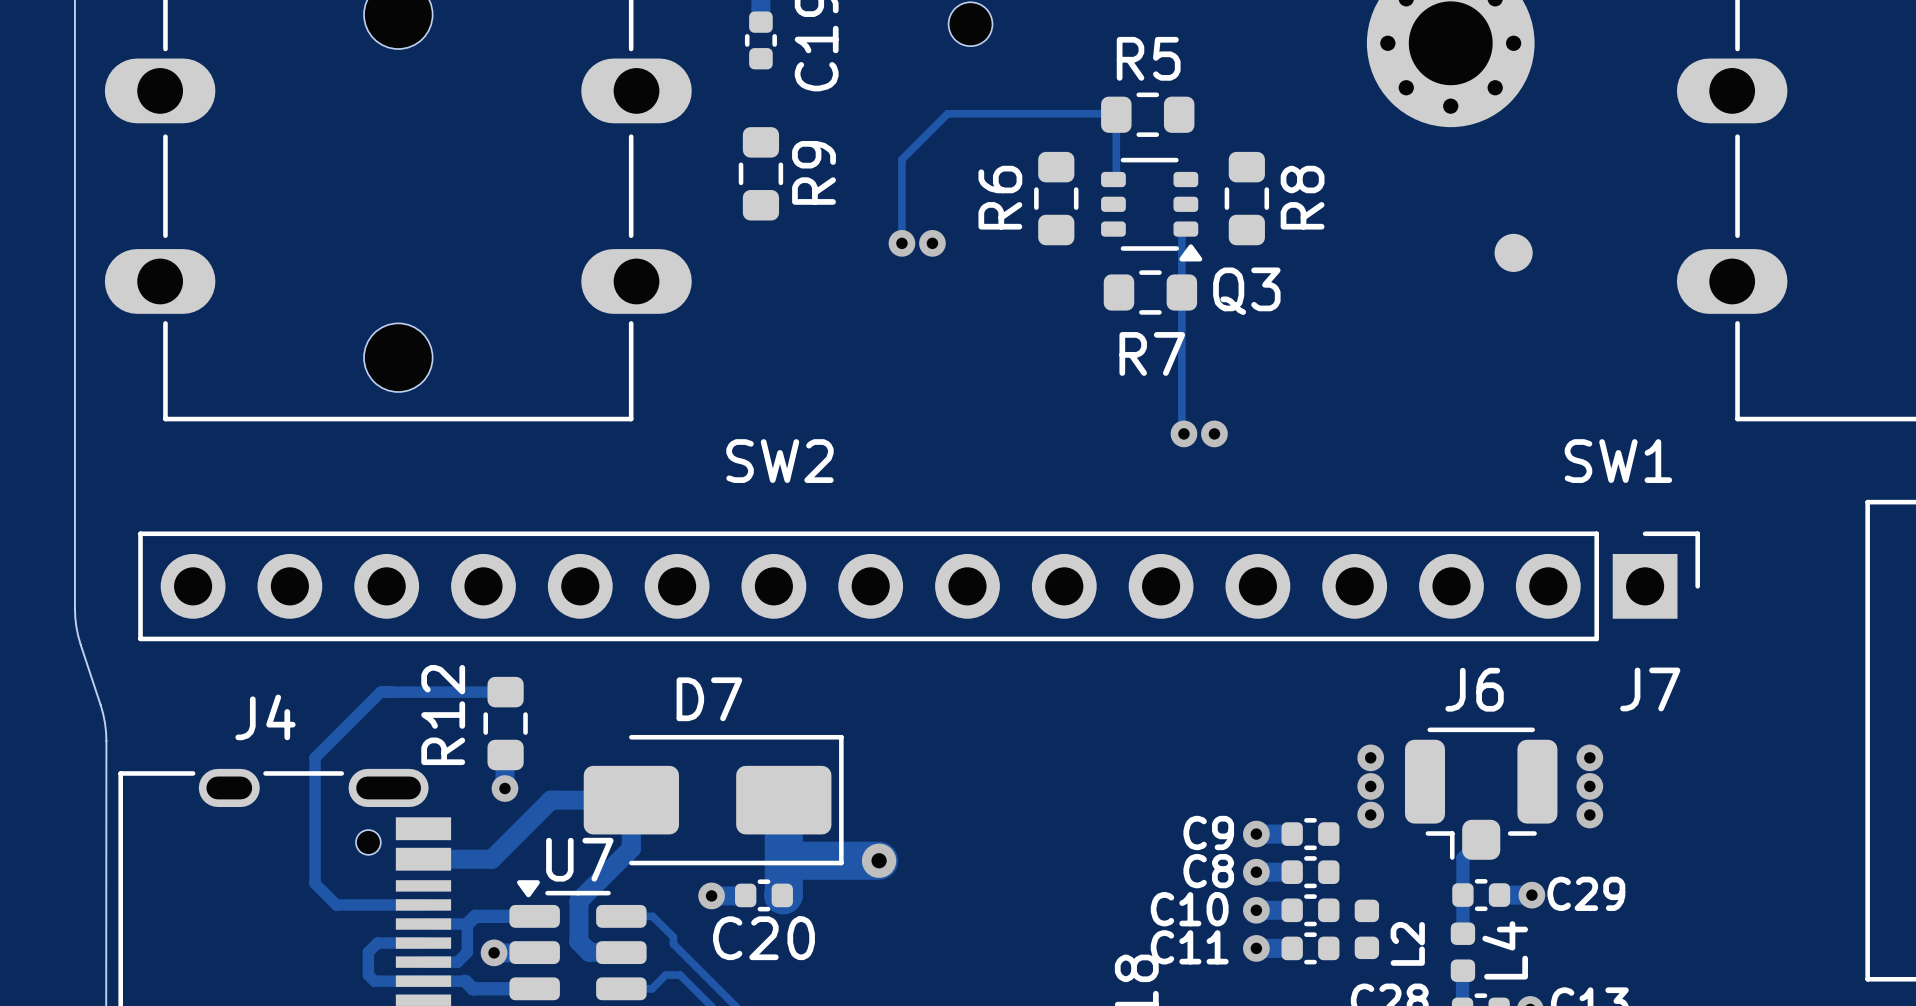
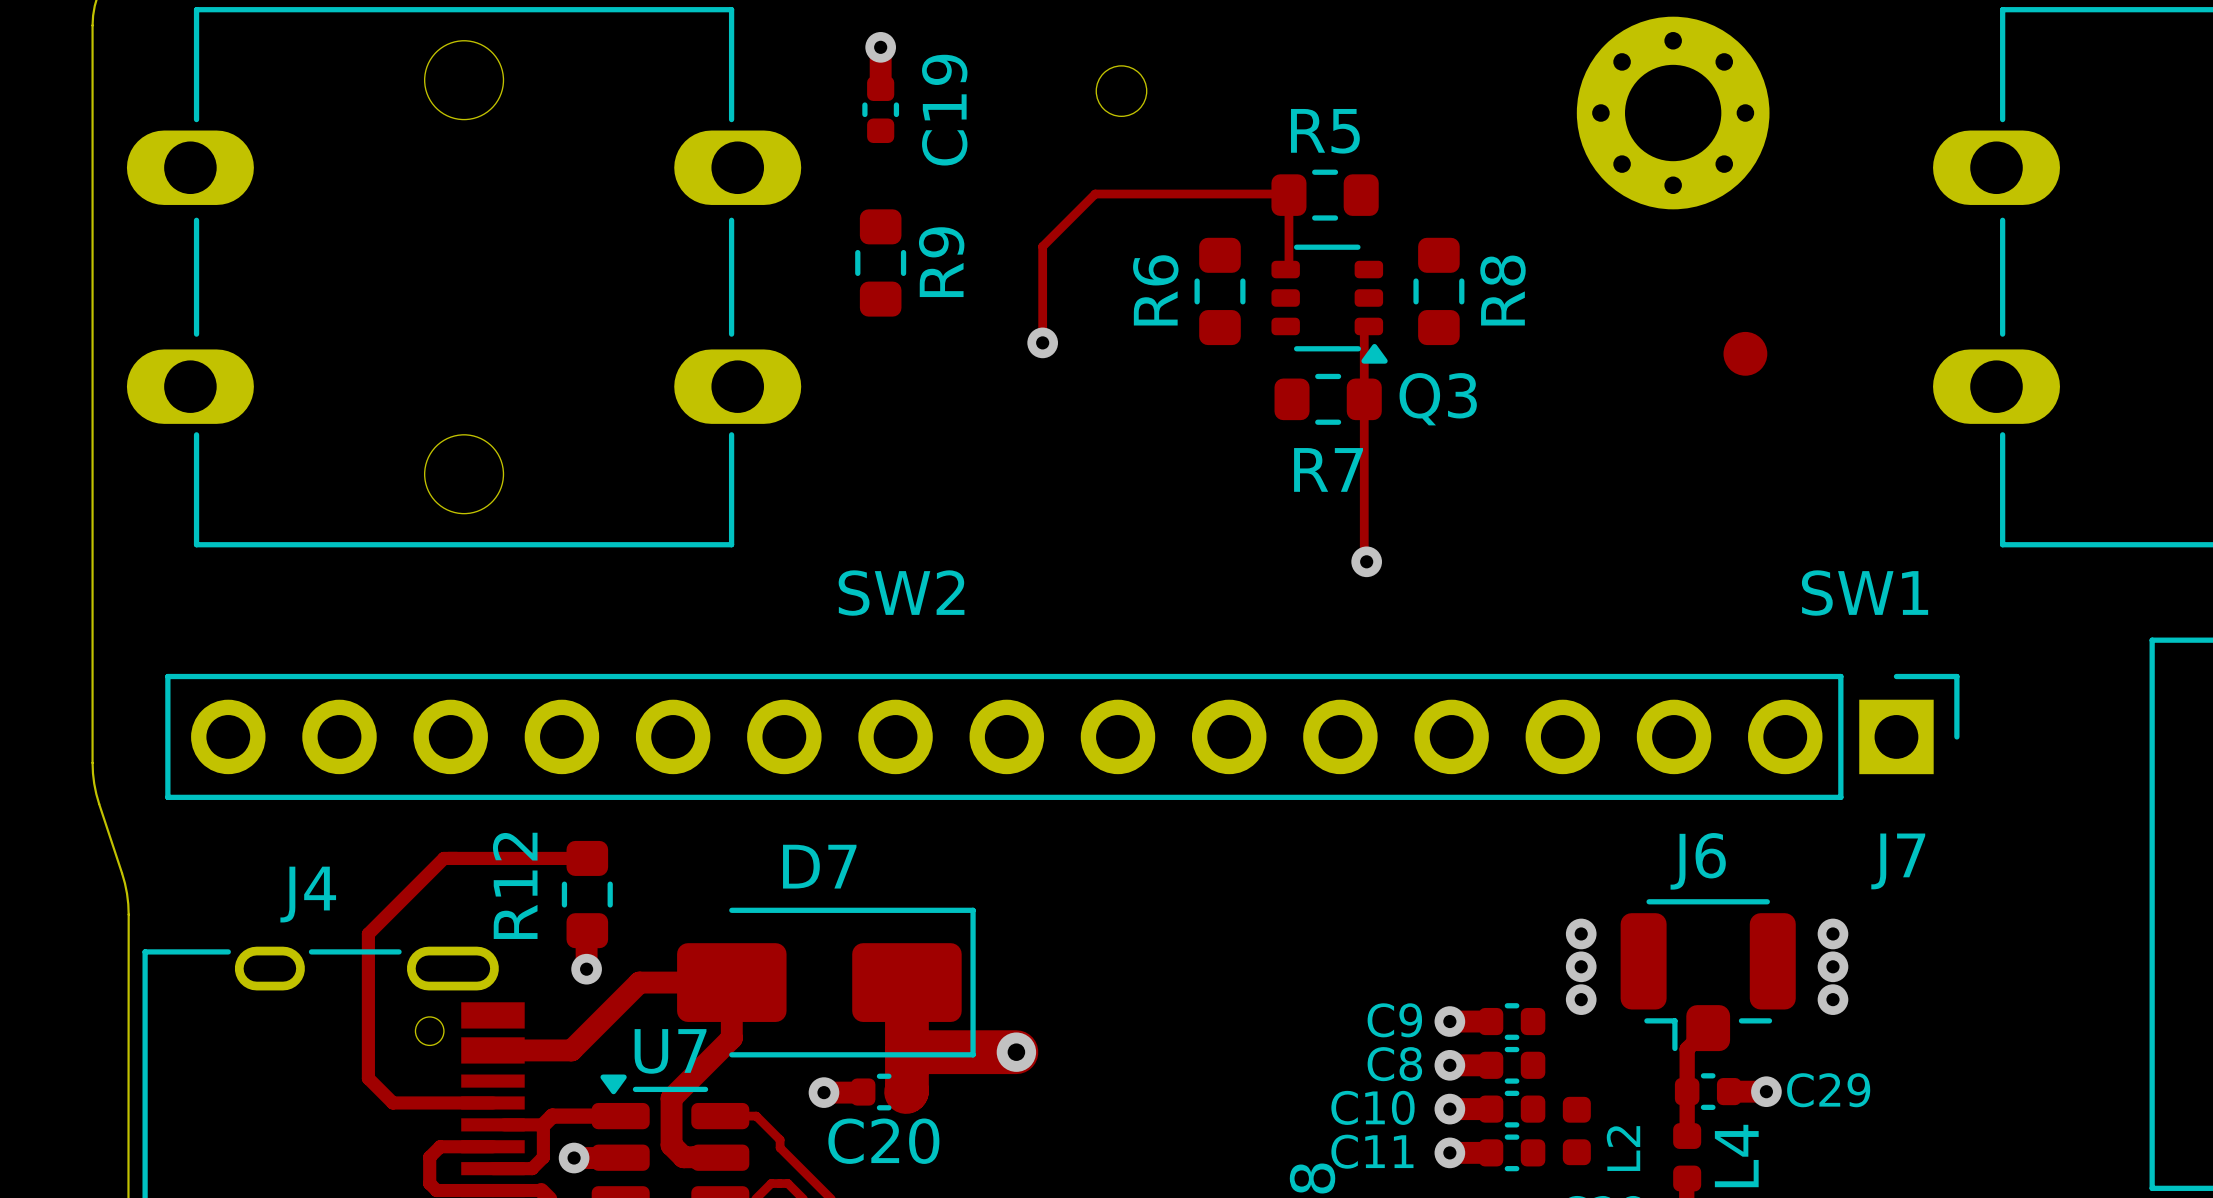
via: (932, 243) -> none
via: (1214, 433) -> none

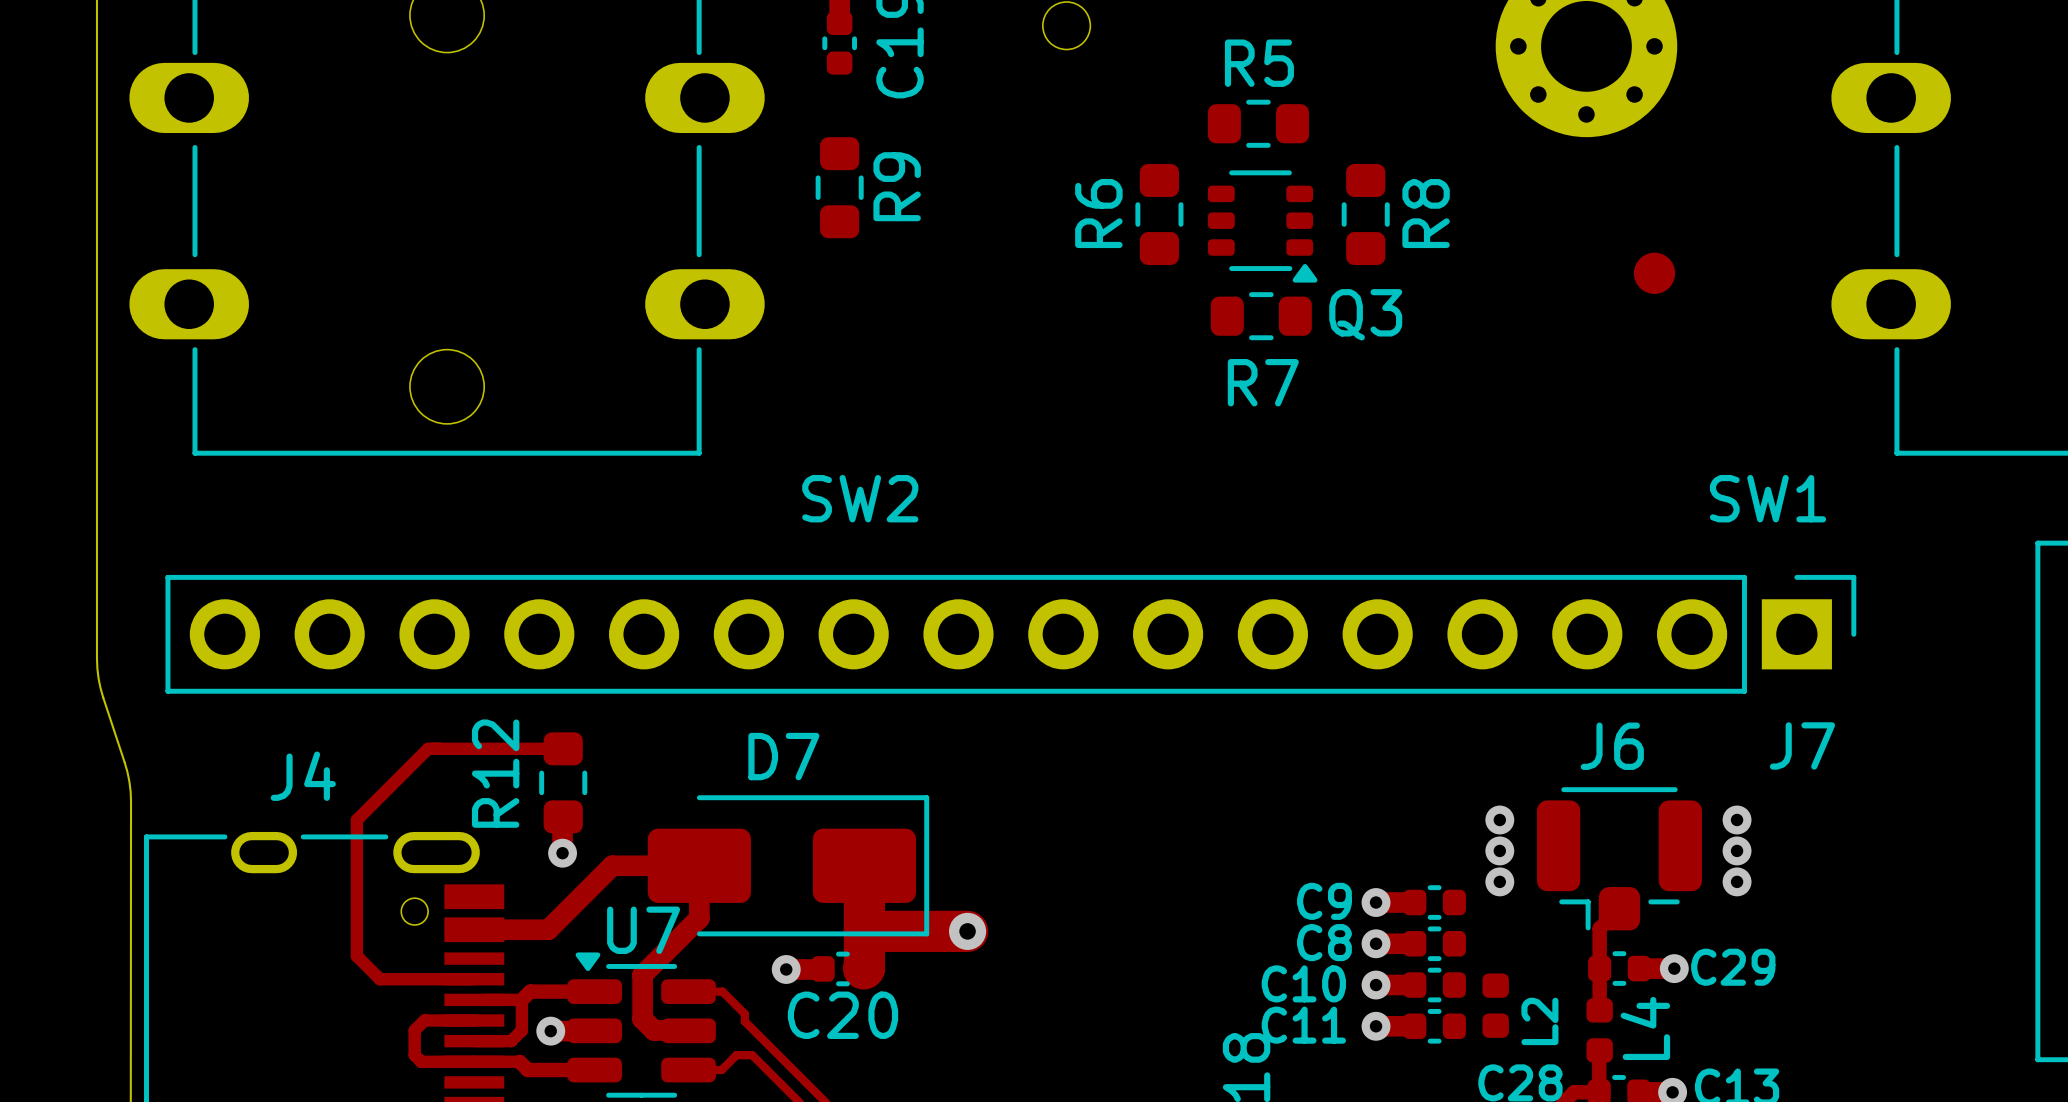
track: (1285, 269) (1288, 266) (1287, 194) (1095, 194) (1042, 246) (1042, 342) -> none
track: (1368, 326) (1364, 331) (1364, 559) (1366, 561) -> none
via: (1042, 342) -> none
via: (1366, 561) -> none

